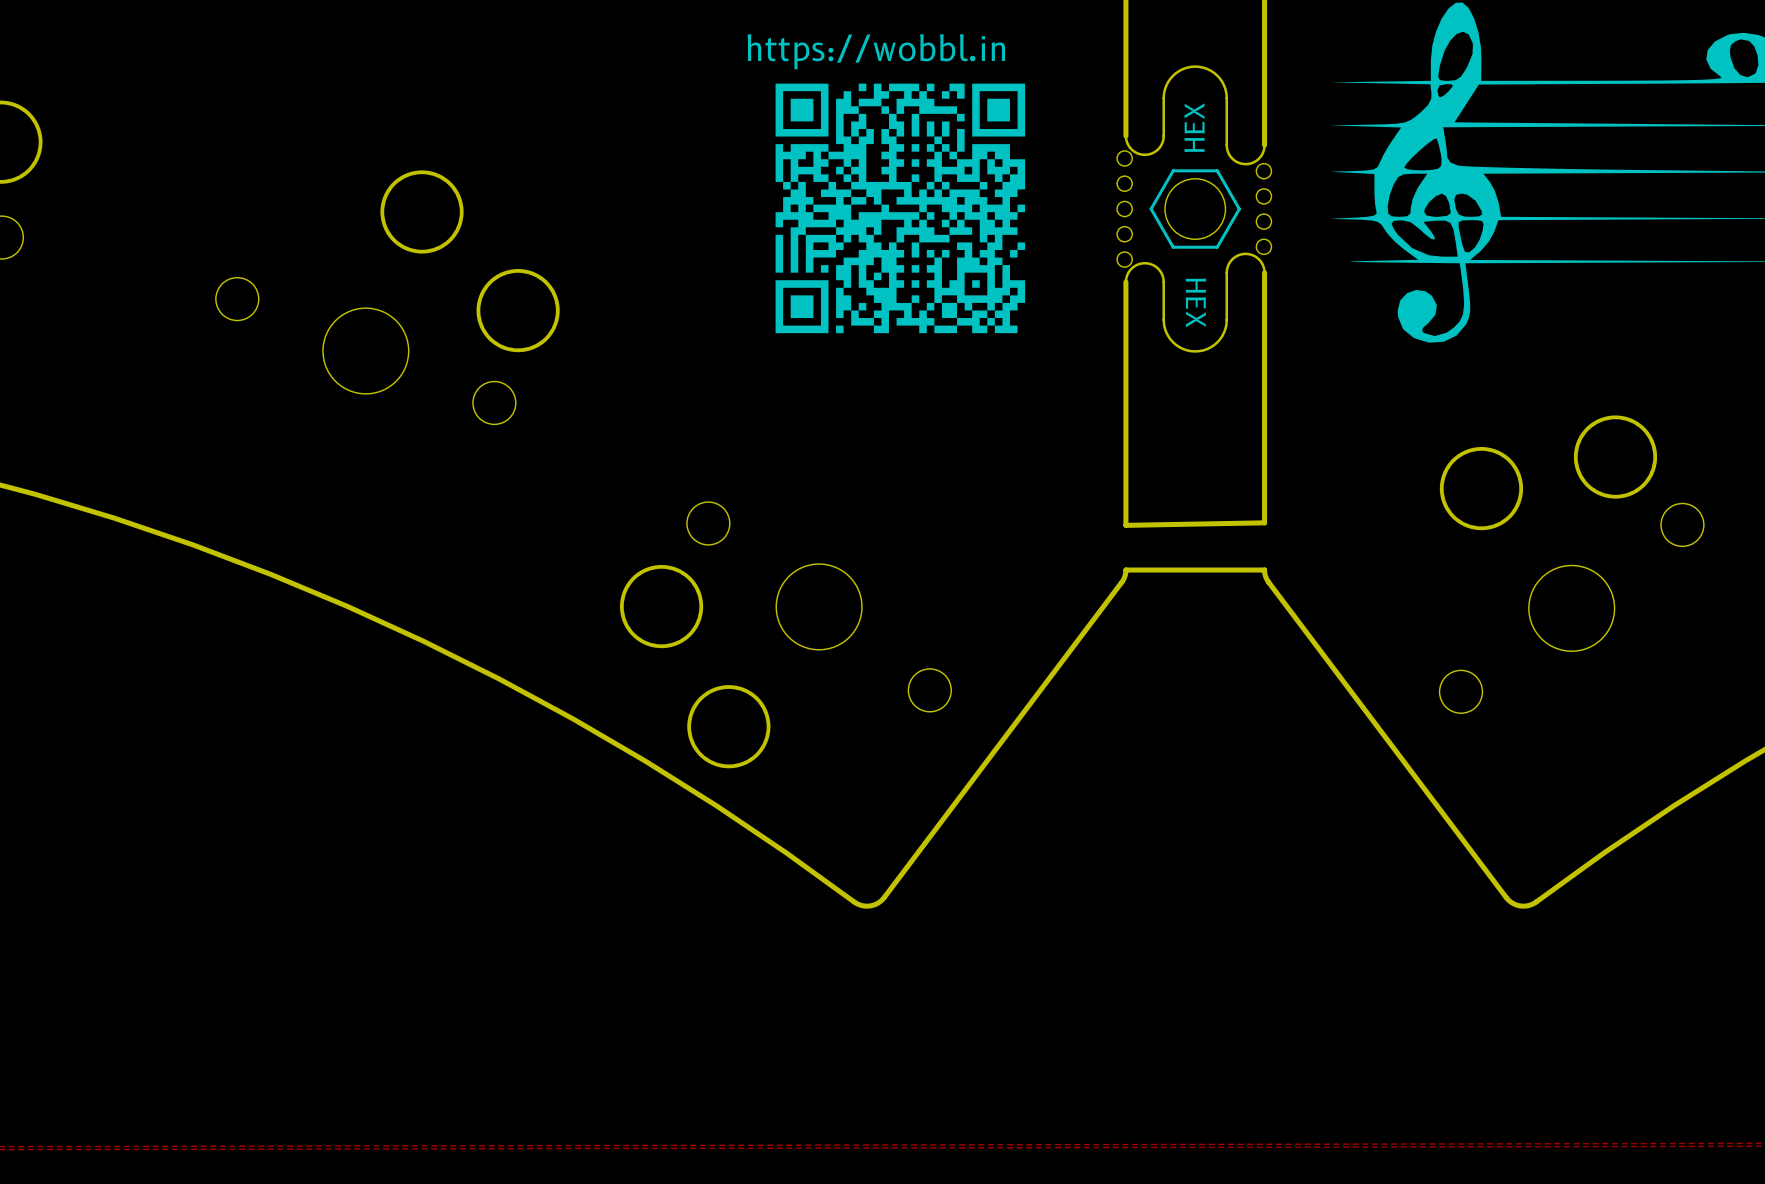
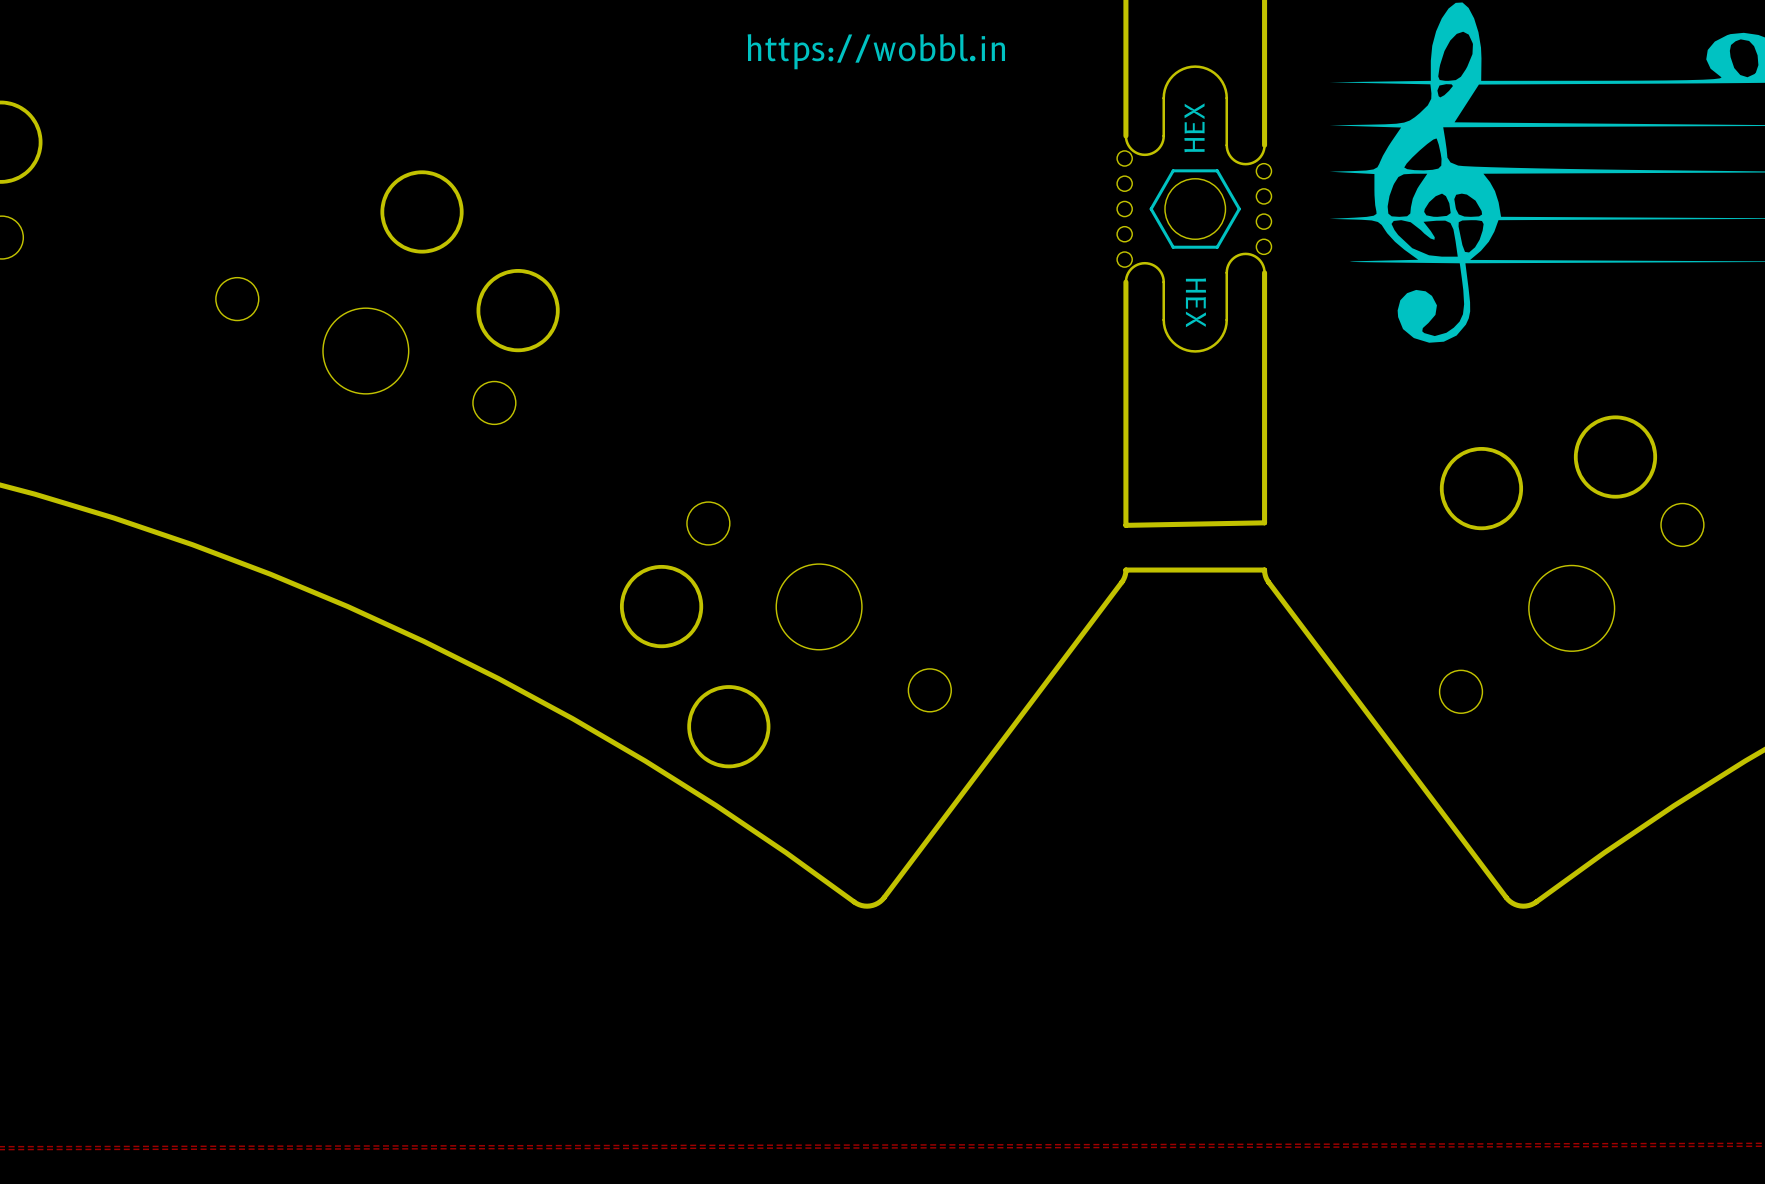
drawing: [775, 83, 1026, 334] -> none

